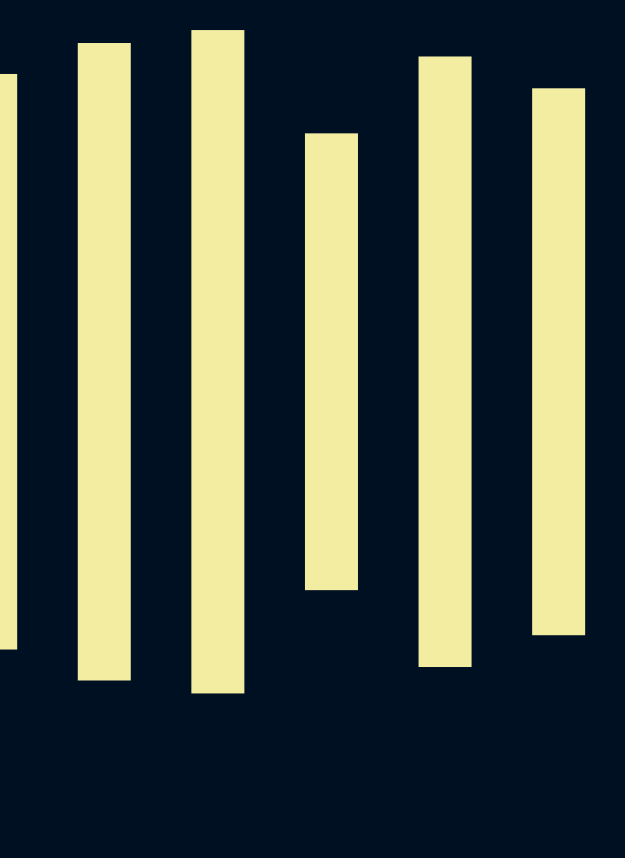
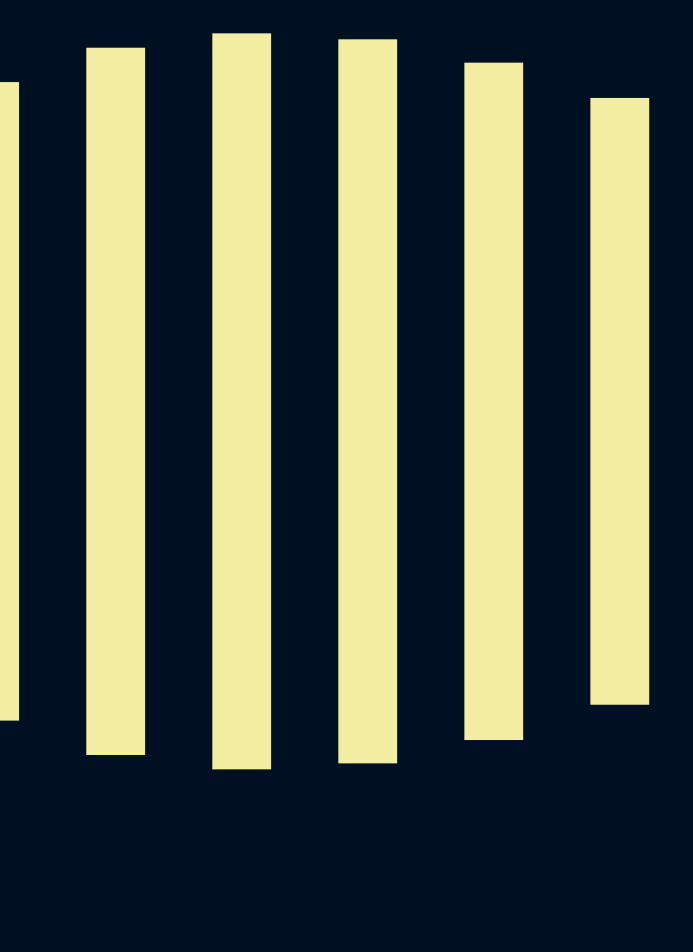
drawing shape: [304, 133, 358, 591] -> [338, 39, 398, 764]

